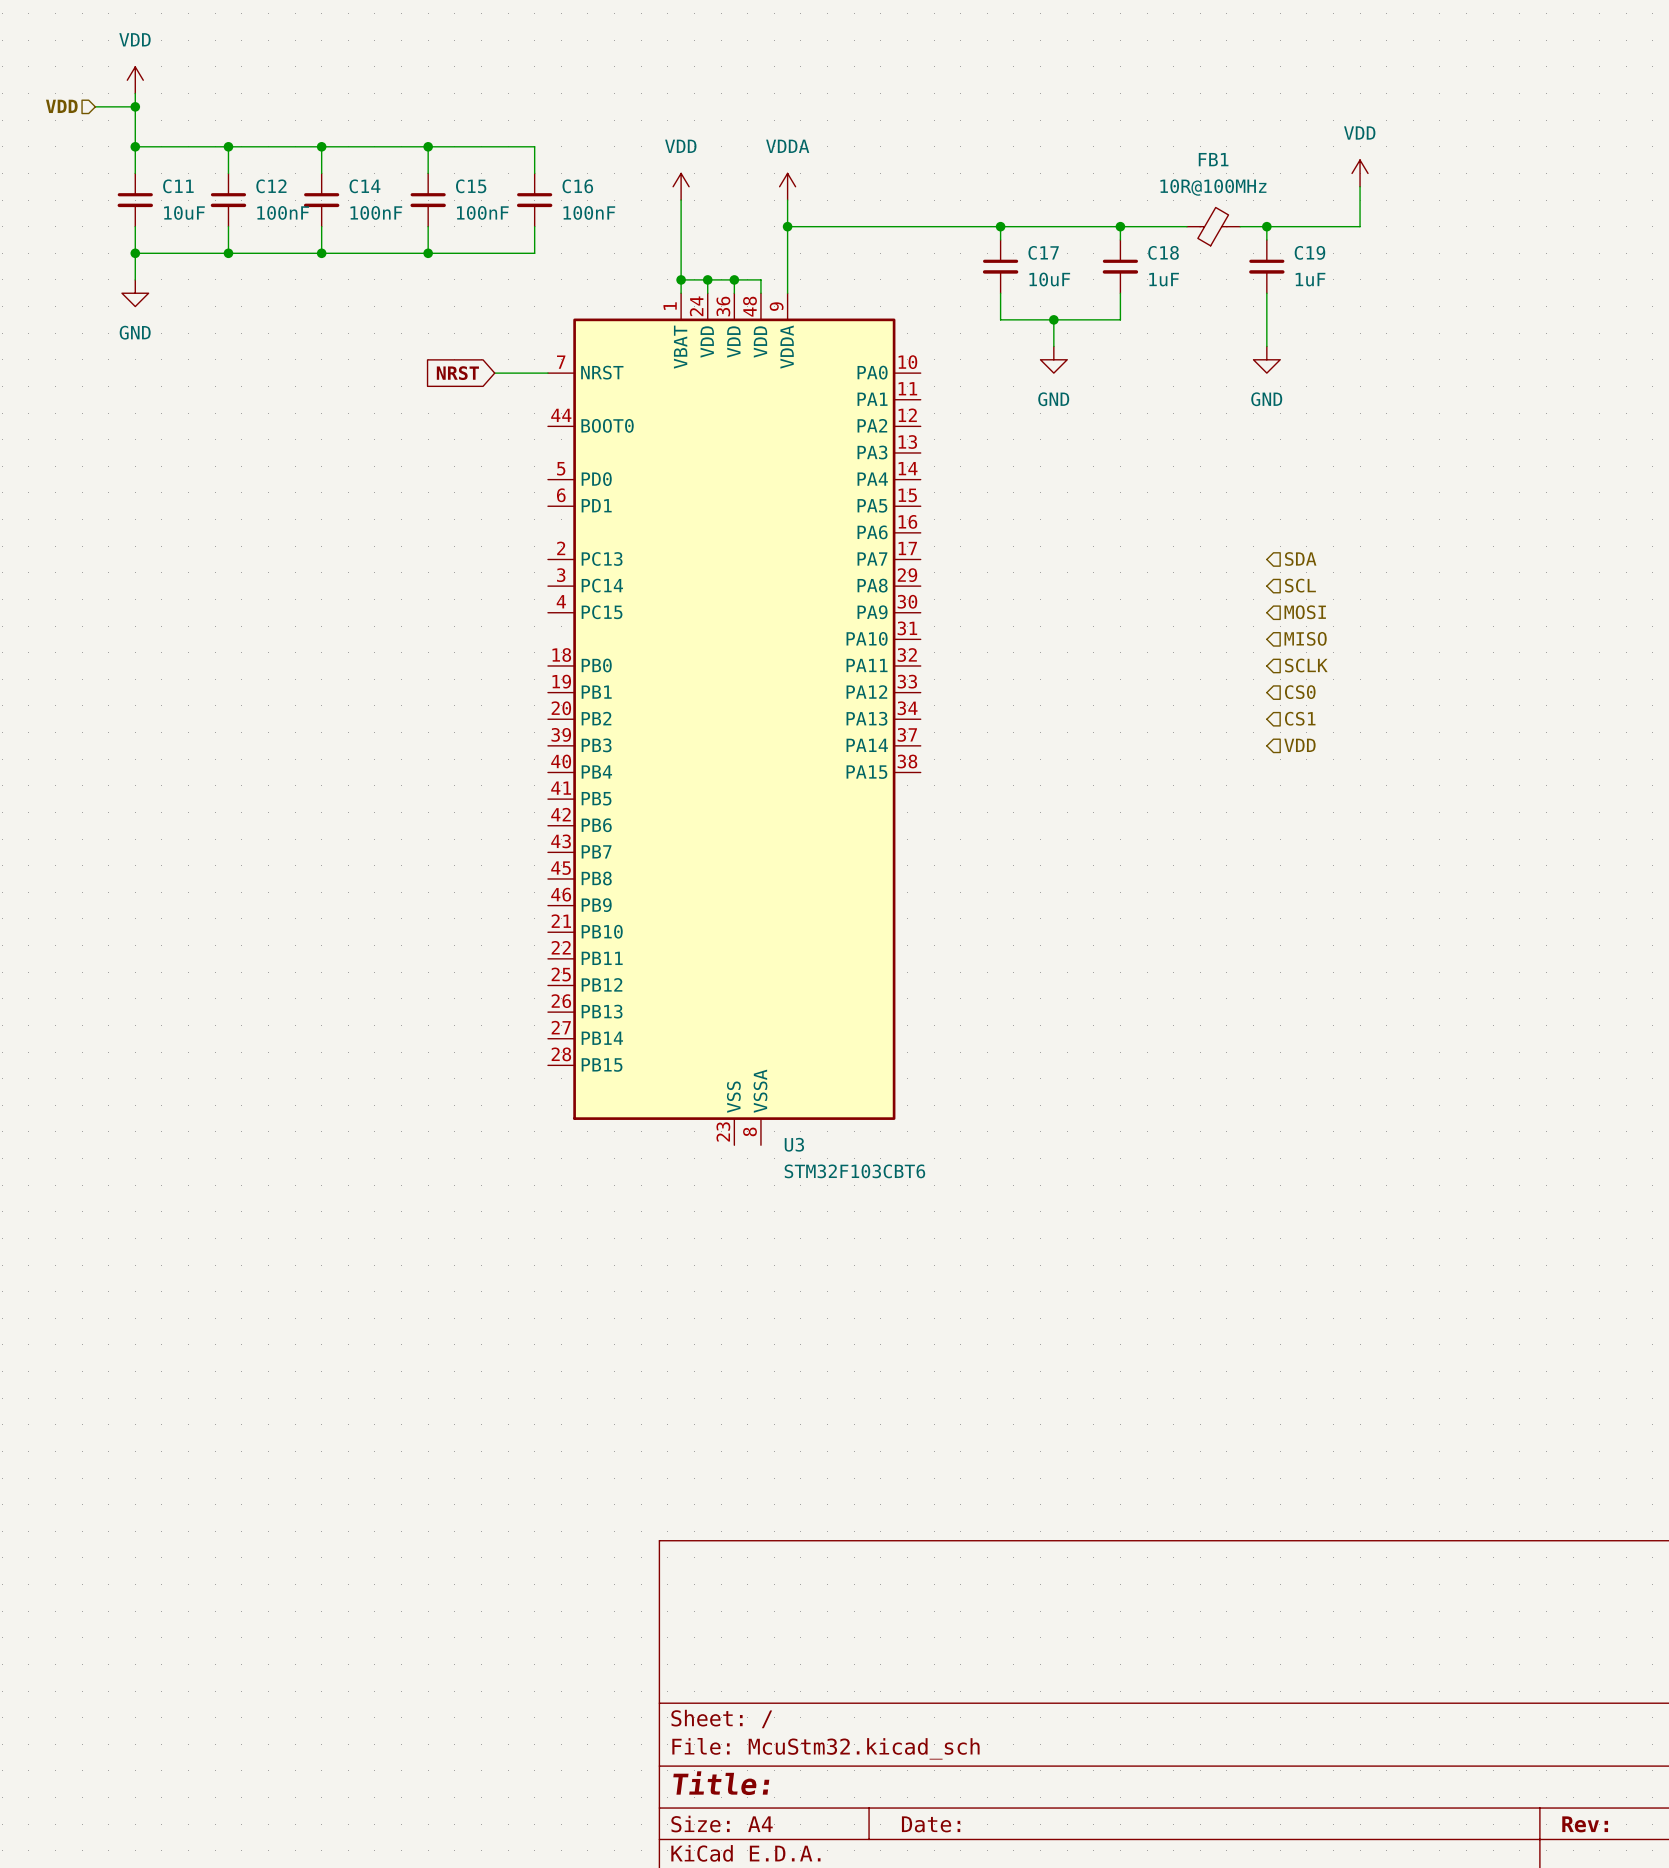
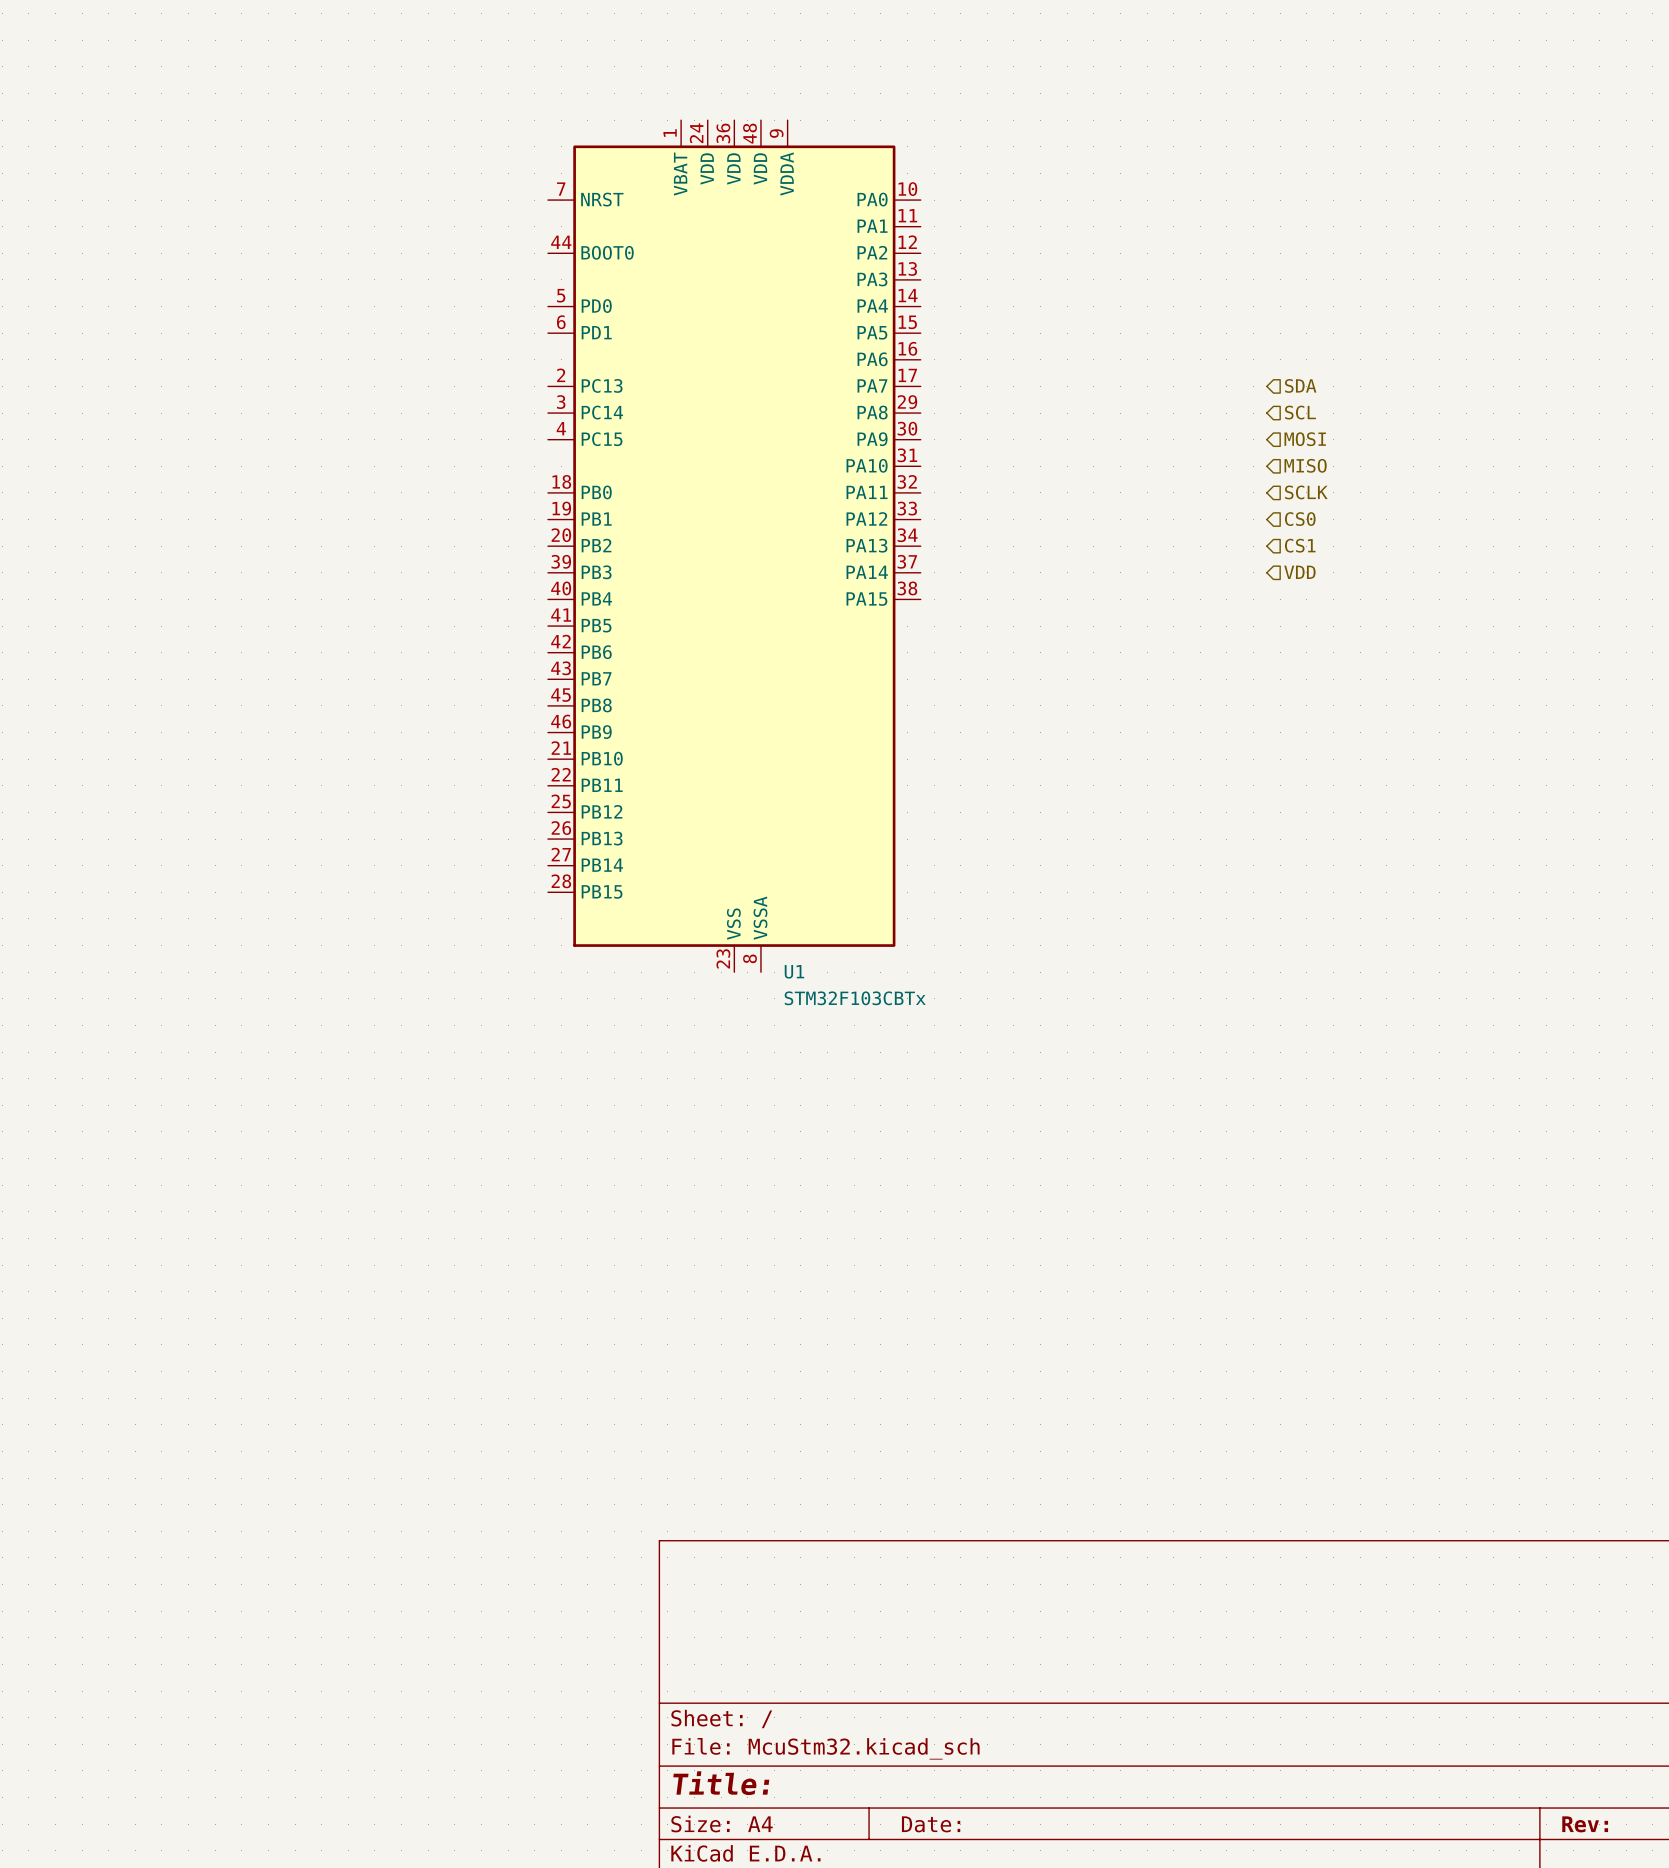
power symbol: VDD (135, 80) -> none
wire: (135, 93) (135, 173) -> none
hierarchical label: VDD (61, 106) -> none
wire: (95, 106) (135, 106) -> none
junction: (135, 106) -> none
wire: (135, 146) (534, 146) (534, 173) -> none
junction: (135, 146) -> none
wire: (228, 146) (228, 173) -> none
junction: (228, 146) -> none
wire: (321, 146) (321, 173) -> none
junction: (321, 146) -> none
wire: (428, 146) (428, 173) -> none
junction: (428, 146) -> none
power symbol: VDD (1360, 173) -> none
power symbol: VDD (681, 186) -> none
power symbol: VDDA (787, 186) -> none
wire: (1360, 186) (1360, 226) (1240, 226) -> none
C11: 10uF (135, 200) -> none
C12: 100nF (228, 200) -> none
C14: 100nF (321, 200) -> none
C15: 100nF (428, 200) -> none
C16: 100nF (534, 200) -> none
wire: (135, 226) (135, 279) -> none
wire: (228, 226) (228, 253) -> none
wire: (321, 226) (321, 253) -> none
wire: (428, 226) (428, 253) -> none
wire: (534, 226) (534, 253) (135, 253) -> none
wire: (787, 226) (1186, 226) -> none
junction: (787, 226) -> none
wire: (1000, 226) (1000, 239) -> none
junction: (1000, 226) -> none
wire: (1120, 226) (1120, 239) -> none
junction: (1120, 226) -> none
FB1: 10R@100MHz (1213, 226) -> none
wire: (1266, 226) (1266, 239) -> none
junction: (1266, 226) -> none
junction: (135, 253) -> none
junction: (228, 253) -> none
junction: (321, 253) -> none
junction: (428, 253) -> none
C17: 10uF (1000, 266) -> none
C18: 1uF (1120, 266) -> none
C19: 1uF (1266, 266) -> none
junction: (681, 279) -> none
junction: (707, 279) -> none
junction: (734, 279) -> none
power symbol: GND (135, 293) -> none
wire: (1000, 293) (1000, 319) (1120, 319) (1120, 293) -> none
wire: (1266, 293) (1266, 346) -> none
wire: (1053, 319) (1053, 346) -> none
junction: (1053, 319) -> none
power symbol: GND (1053, 359) -> none
power symbol: GND (1266, 359) -> none
global label: NRST (457, 373) -> none
wire: (494, 373) (547, 373) -> none
U1: none -> STM32F103CBTx (734, 546)
hierarchical label position: SDA (1300, 559) -> SDA (1300, 385)
hierarchical label position: SCL (1300, 585) -> SCL (1300, 412)
hierarchical label position: MOSI (1305, 612) -> MOSI (1305, 439)
hierarchical label position: MISO (1305, 638) -> MISO (1305, 465)
hierarchical label position: SCLK (1306, 665) -> SCLK (1306, 492)
hierarchical label position: CS0 (1300, 692) -> CS0 (1300, 519)
hierarchical label position: CS1 (1300, 718) -> CS1 (1300, 545)
U3: STM32F103CBT6 (734, 719) -> none
hierarchical label position: VDD (1299, 745) -> VDD (1299, 572)

